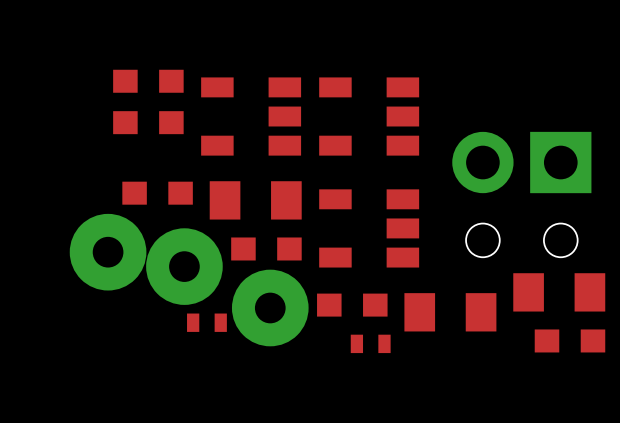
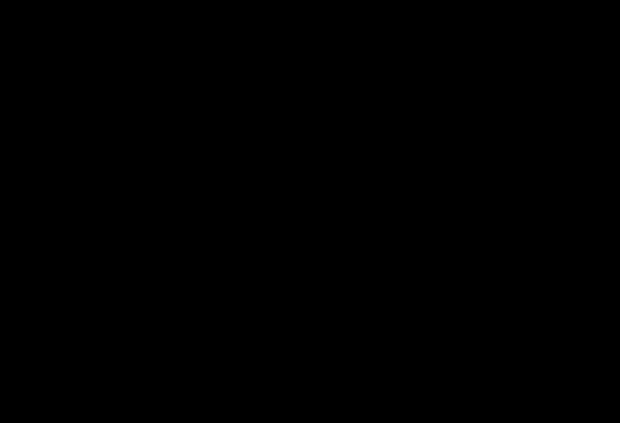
part: (148, 81) -> none
part: (251, 116) -> none
part: (369, 116) -> none
part: (148, 122) -> none
part: (157, 193) -> none
part: (521, 194) -> none
part: (255, 200) -> none
part: (369, 228) -> none
part: (266, 248) -> none
part: (108, 252) -> none
part: (184, 266) -> none
part: (559, 292) -> none
part: (352, 305) -> none
part: (270, 307) -> none
part: (450, 312) -> none
part: (206, 322) -> none
part: (569, 340) -> none
part: (370, 343) -> none

